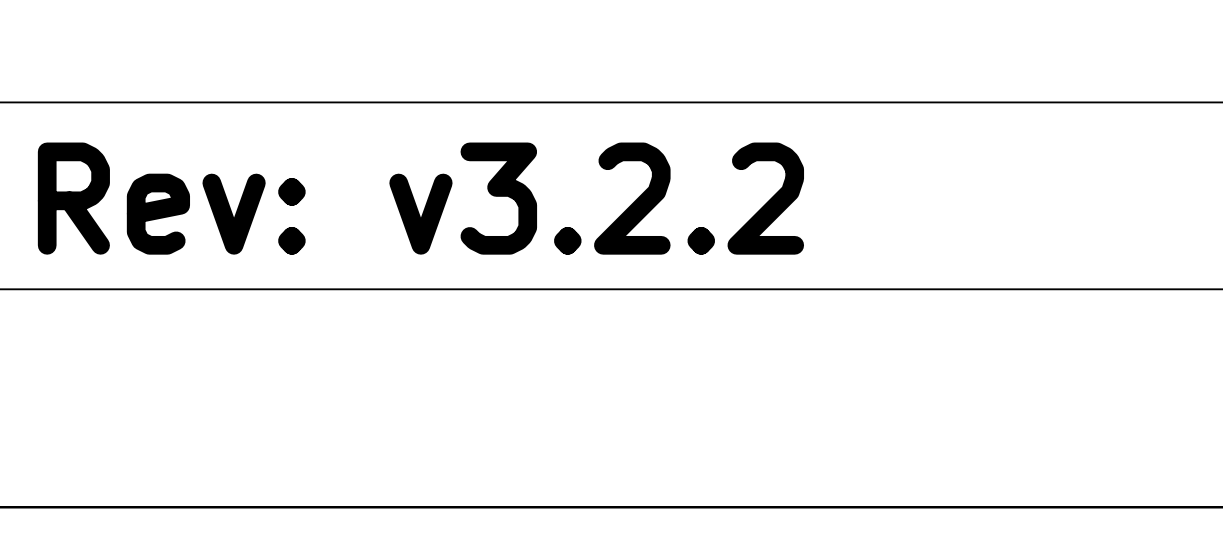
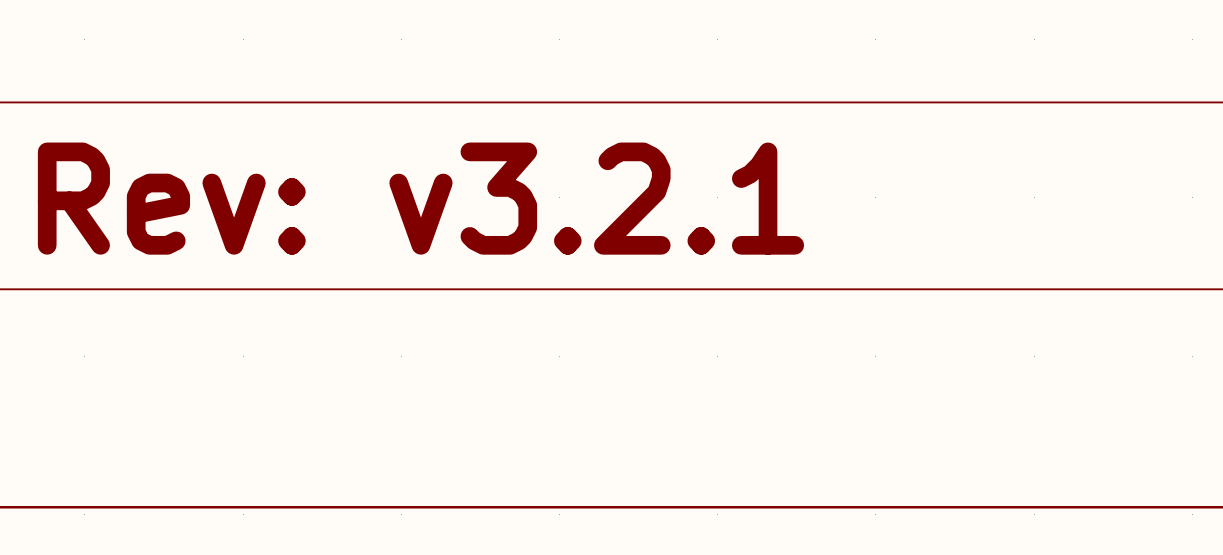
title block: Rev: v3.2.2 (420, 198) -> Rev: v3.2.1 (420, 198)

